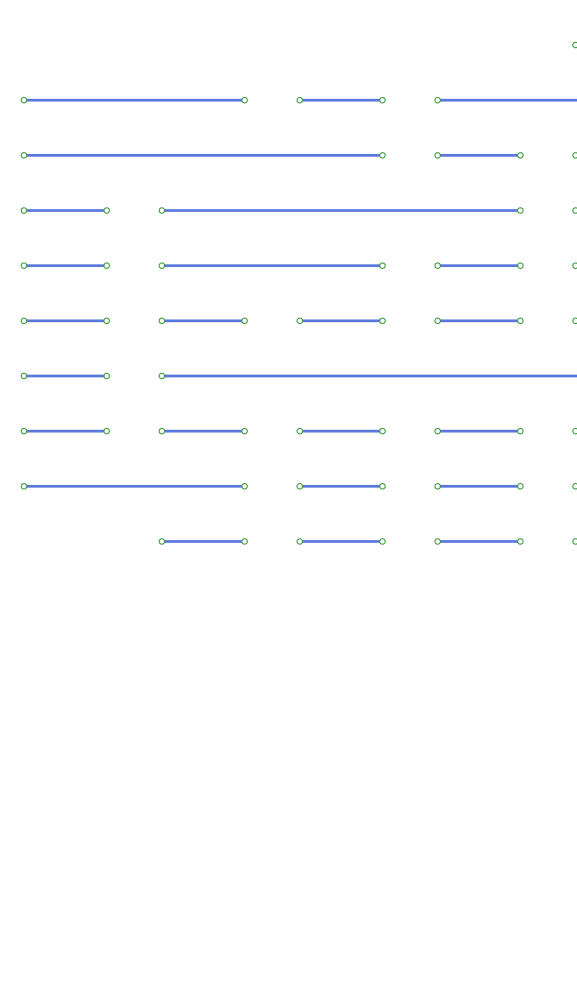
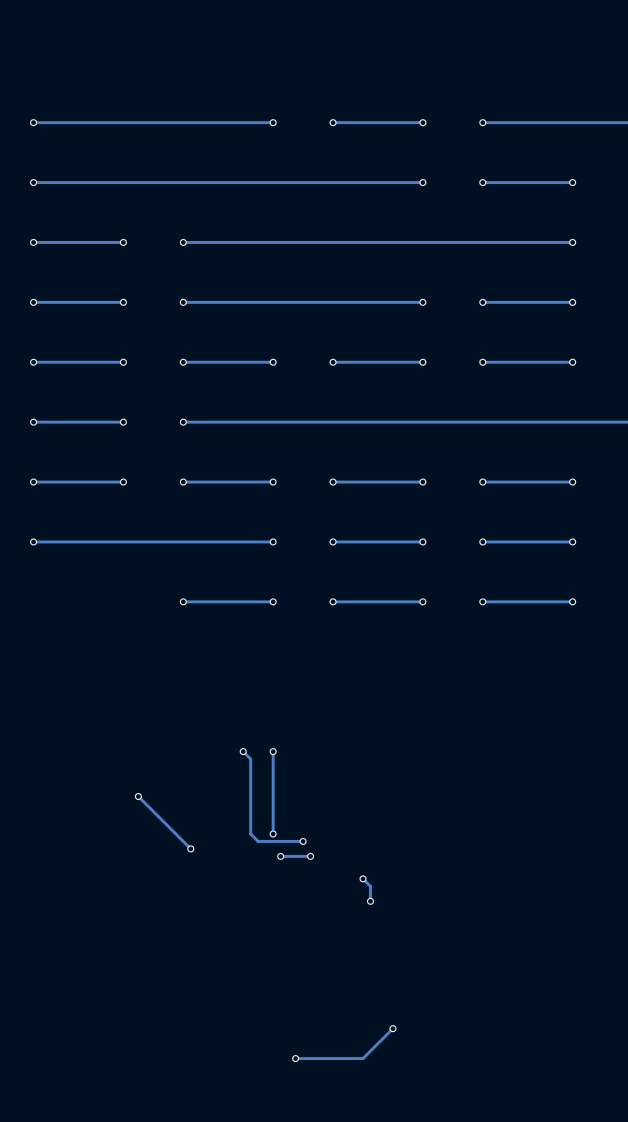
track: none -> (243, 751) (250, 759) (250, 833) (258, 841) (303, 841)
via: none -> (243, 751)
track: none -> (273, 751) (273, 833)
via: none -> (273, 751)
track: none -> (138, 796) (190, 848)
via: none -> (138, 796)
via: none -> (273, 833)
via: none -> (303, 841)
via: none -> (190, 848)
via: none -> (280, 856)
track: none -> (310, 856) (280, 856)
via: none -> (310, 856)
track: none -> (363, 878) (370, 886) (370, 901)
via: none -> (363, 878)
via: none -> (370, 901)
track: none -> (392, 1028) (363, 1058) (295, 1058)
via: none -> (392, 1028)
via: none -> (295, 1058)

